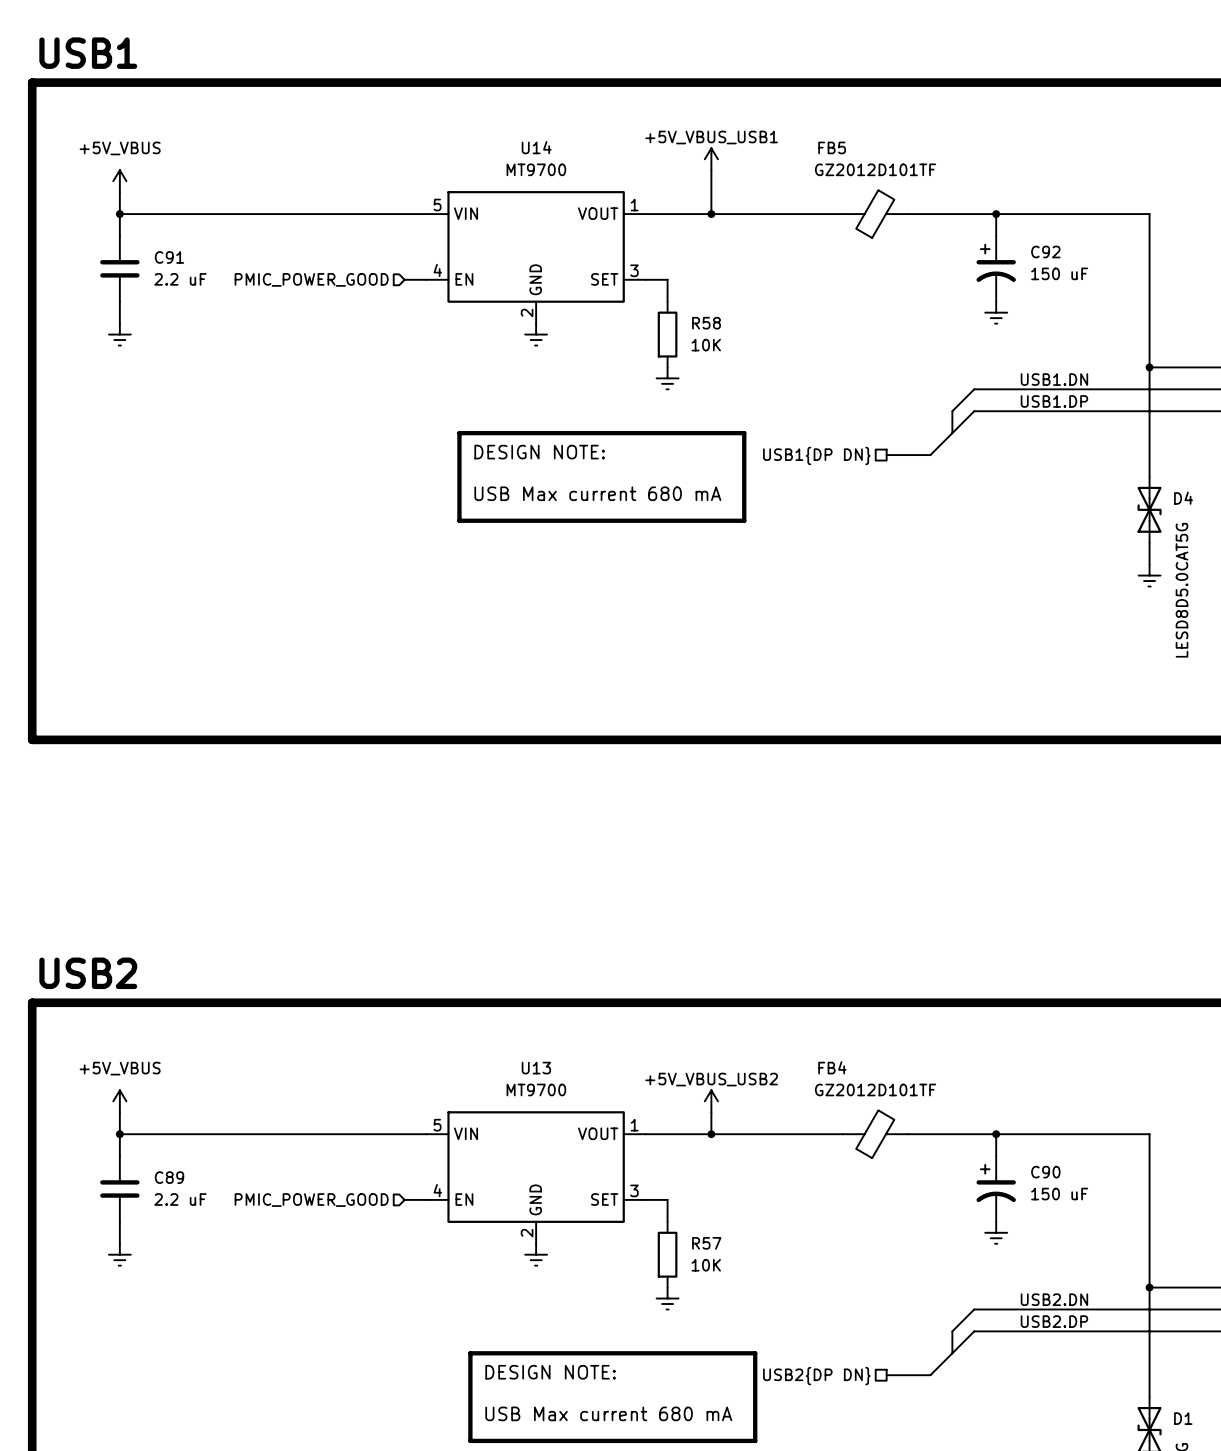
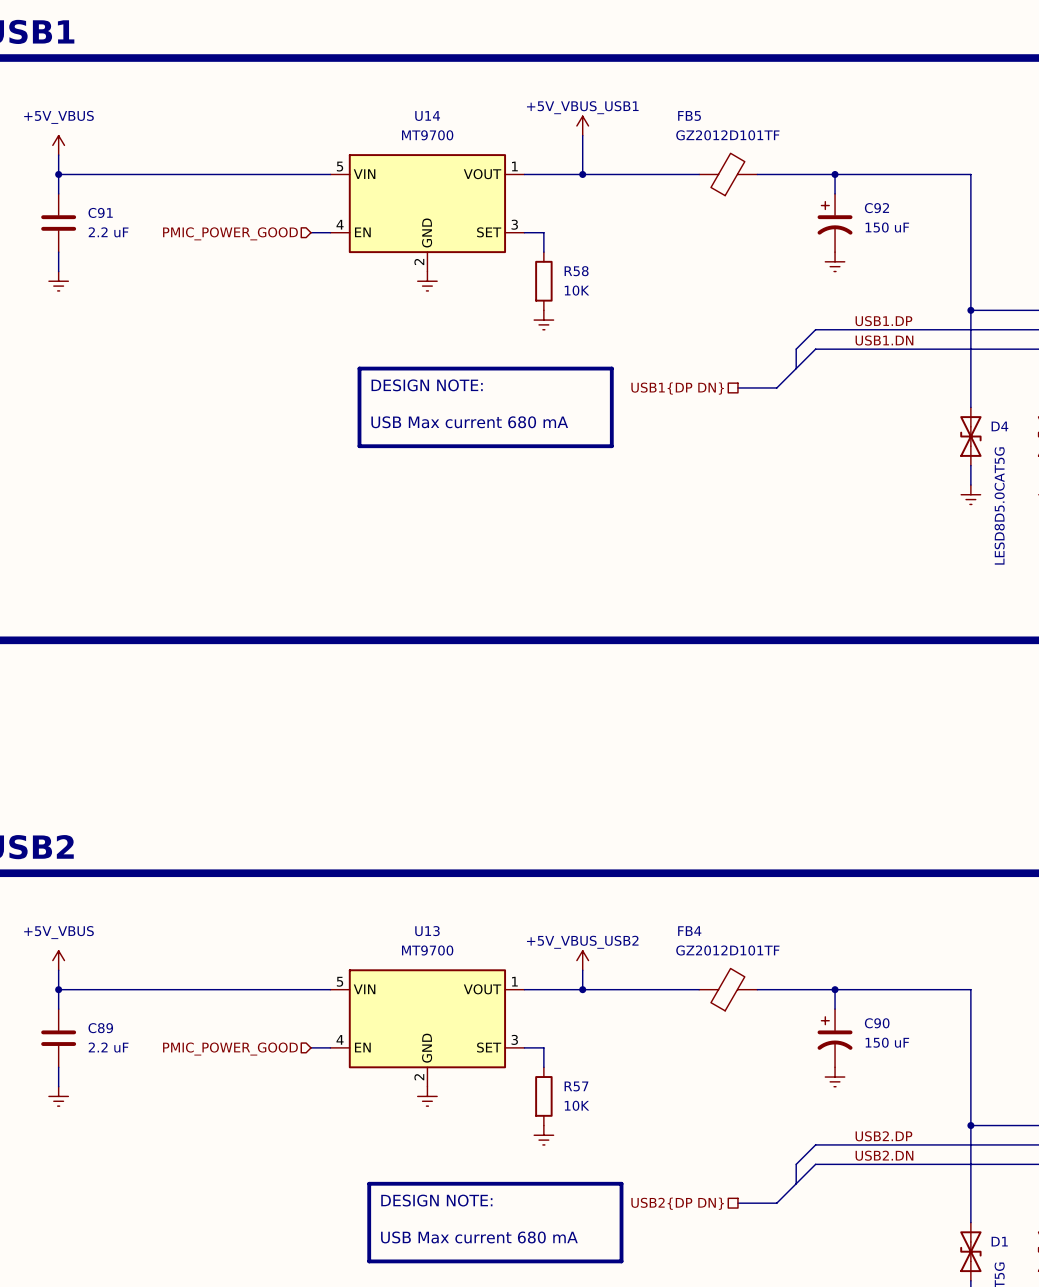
label: USB1.DN (1054, 379) -> USB1.DP (883, 321)
label: USB1.DP (1054, 401) -> USB1.DN (884, 340)
label: USB2.DN (1054, 1299) -> USB2.DP (883, 1136)
label: USB2.DP (1054, 1321) -> USB2.DN (884, 1155)

